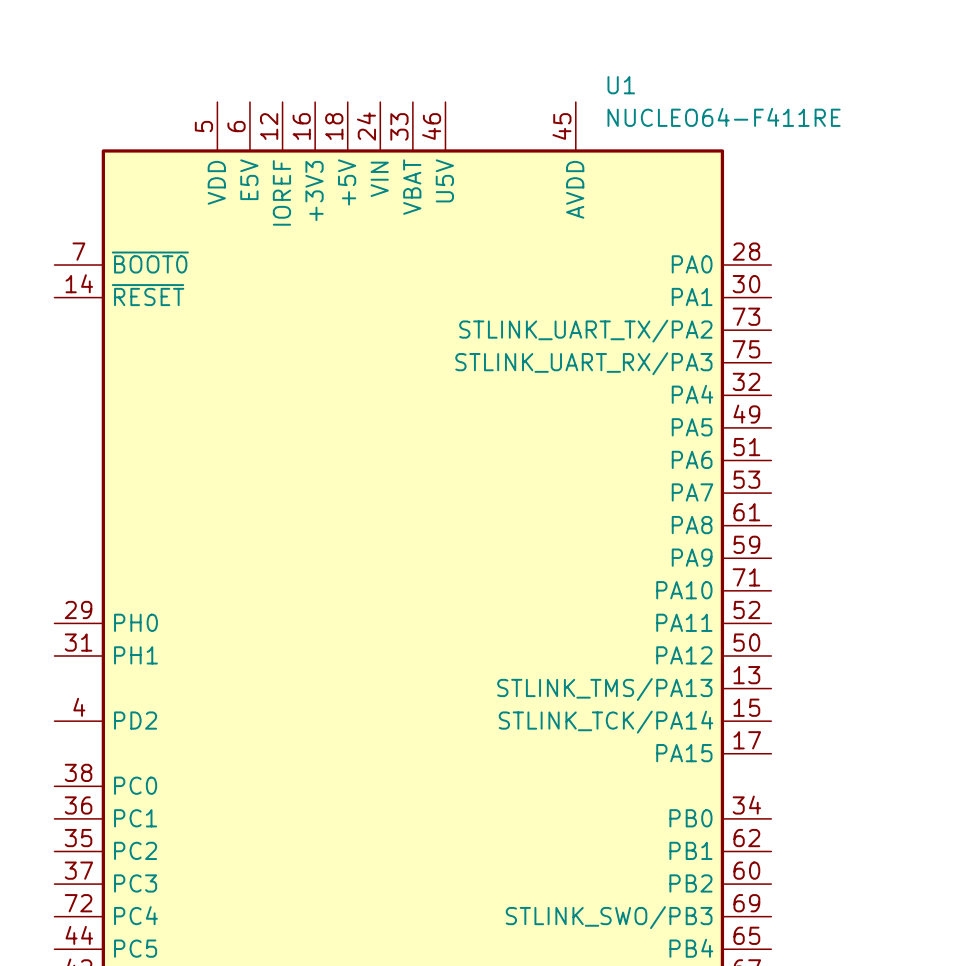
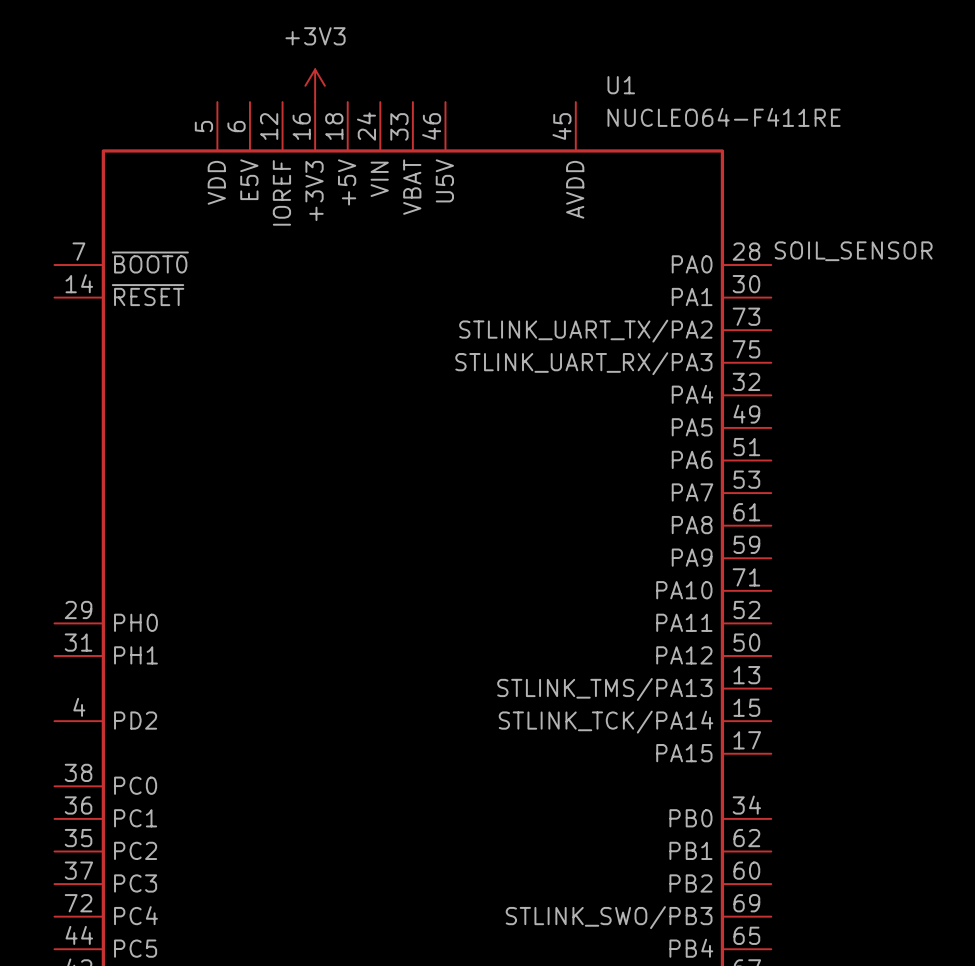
power symbol: none -> +3V3 (315, 85)
label: none -> SOIL_SENSOR (853, 251)

